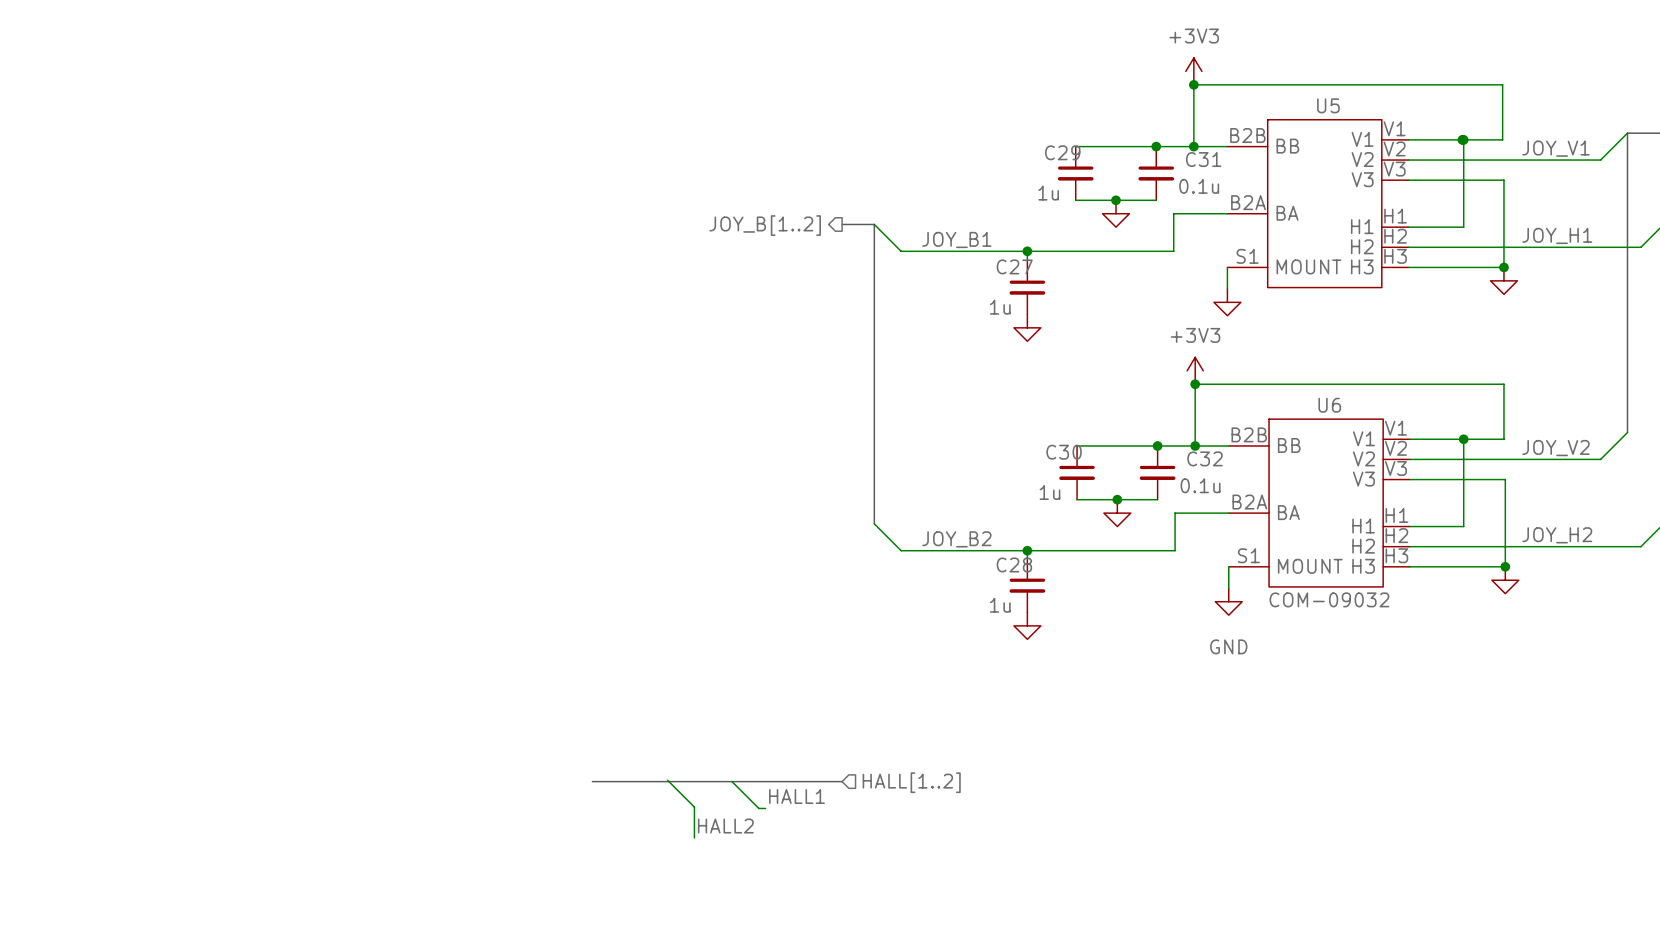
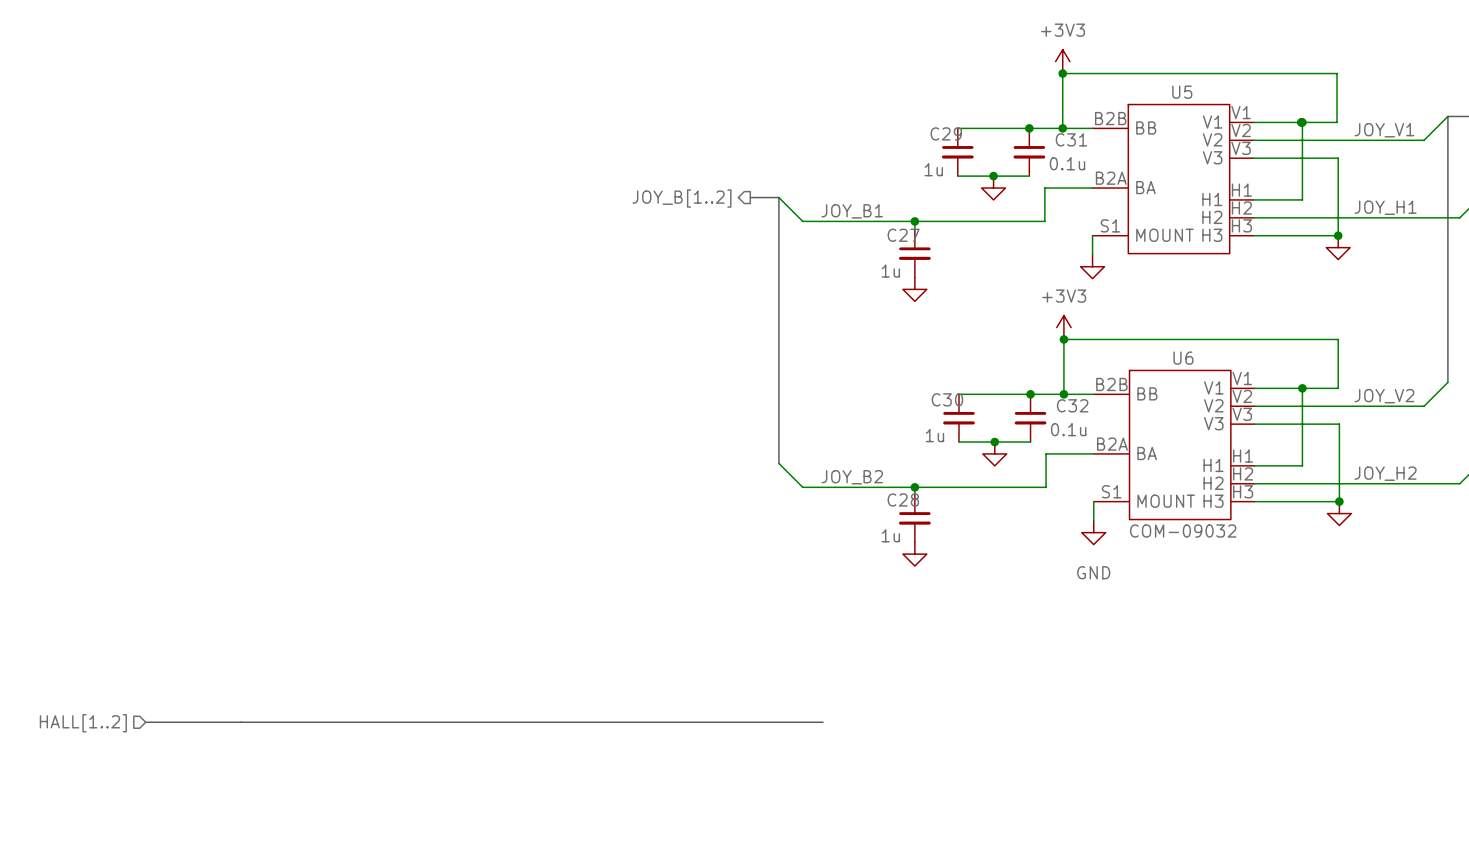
wire: (667, 780) (694, 807) (694, 838) -> none
bus: (592, 781) (842, 781) -> none
wire: (732, 781) (758, 808) (765, 808) -> none
hierarchical label: HALL[1..2] (911, 782) -> none
label: HALL1 (797, 796) -> none
bus: none -> (145, 722) (823, 722)
hierarchical label: none -> HALL[1..2] (83, 723)
label: HALL2 (725, 826) -> none

